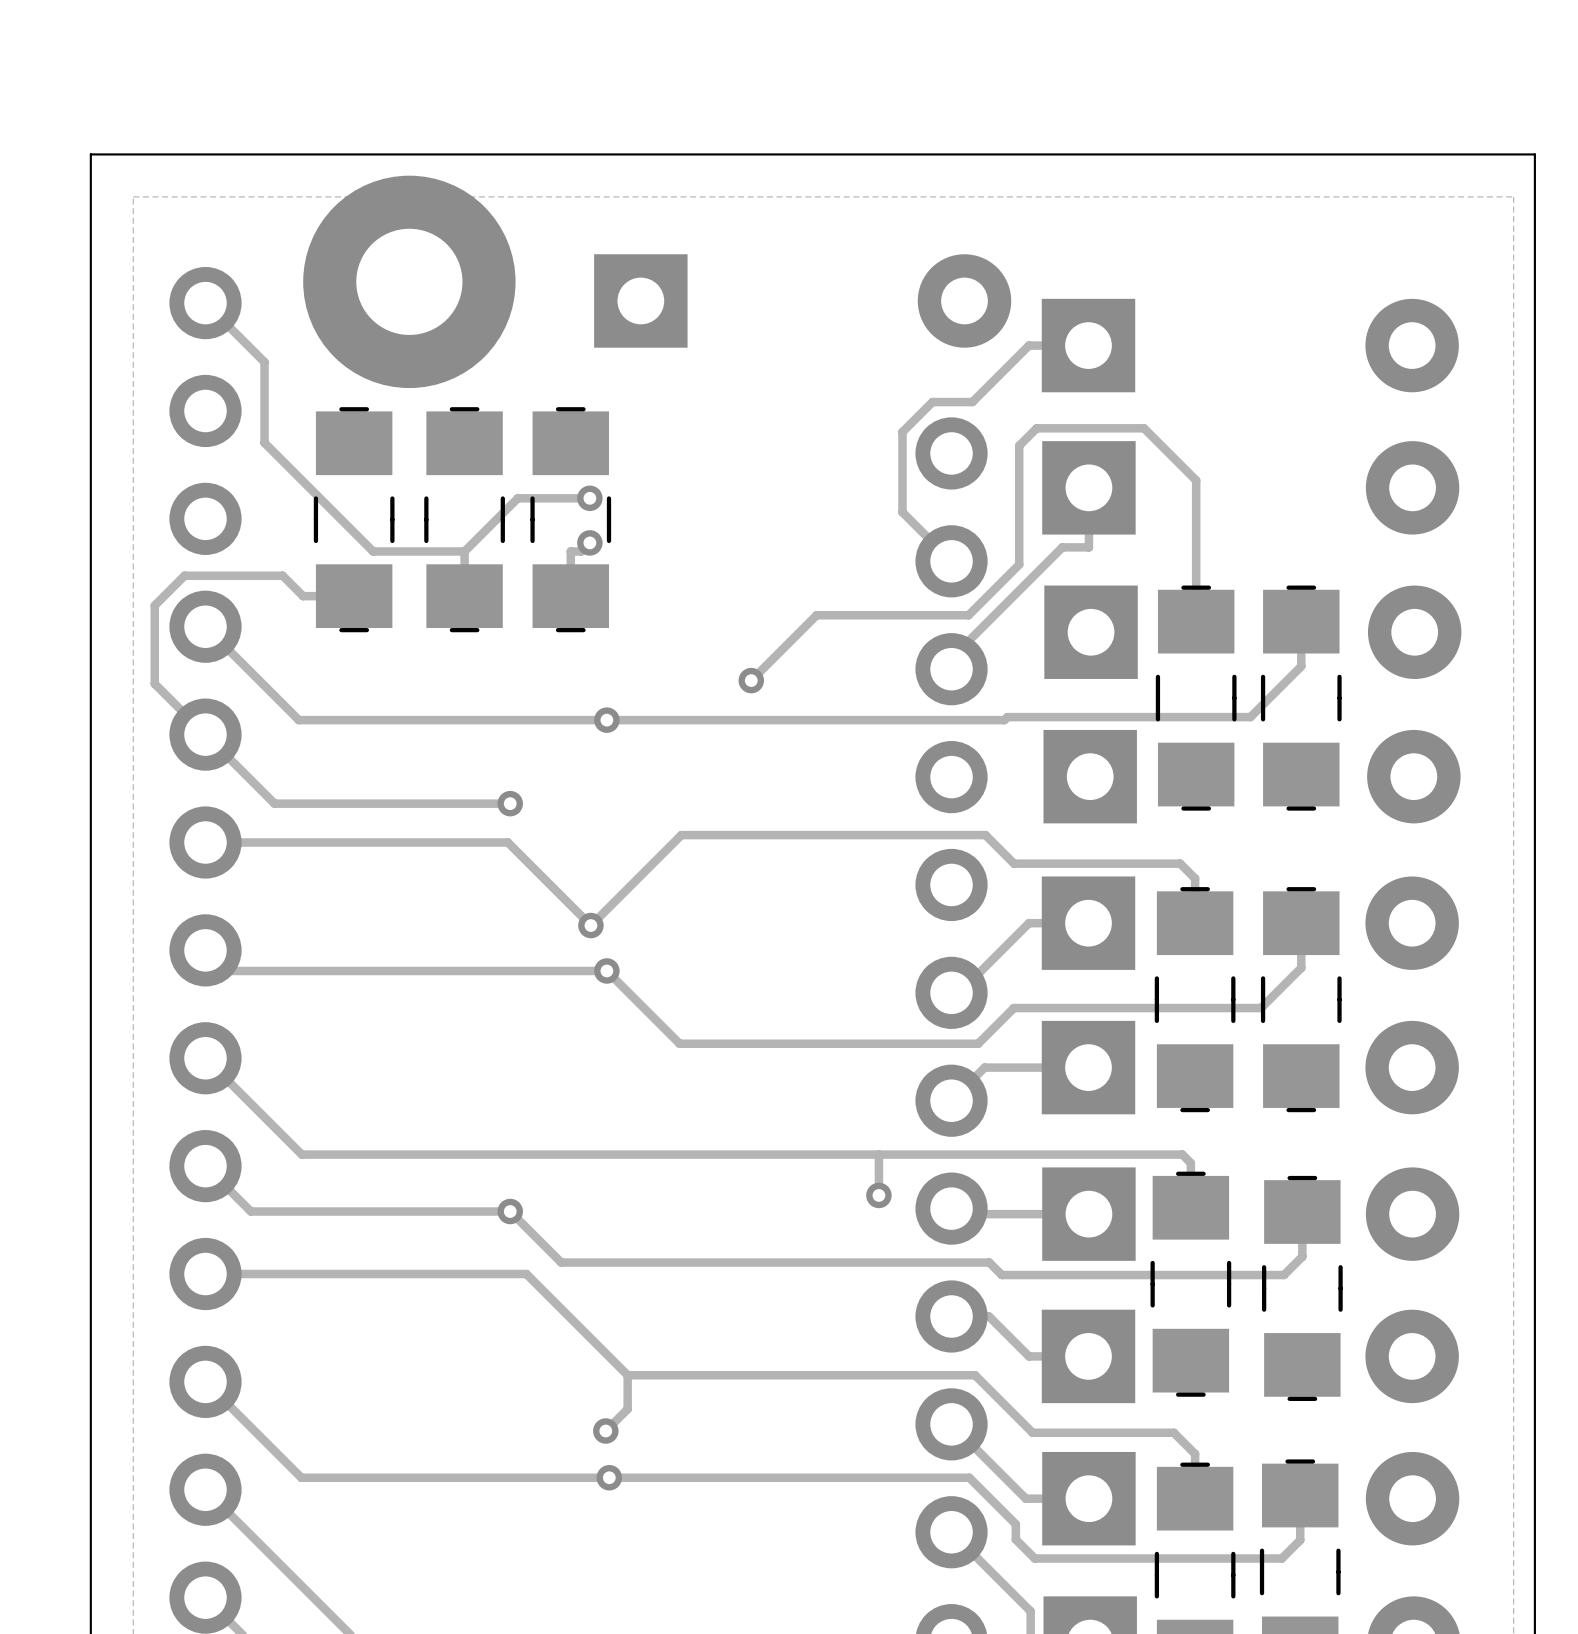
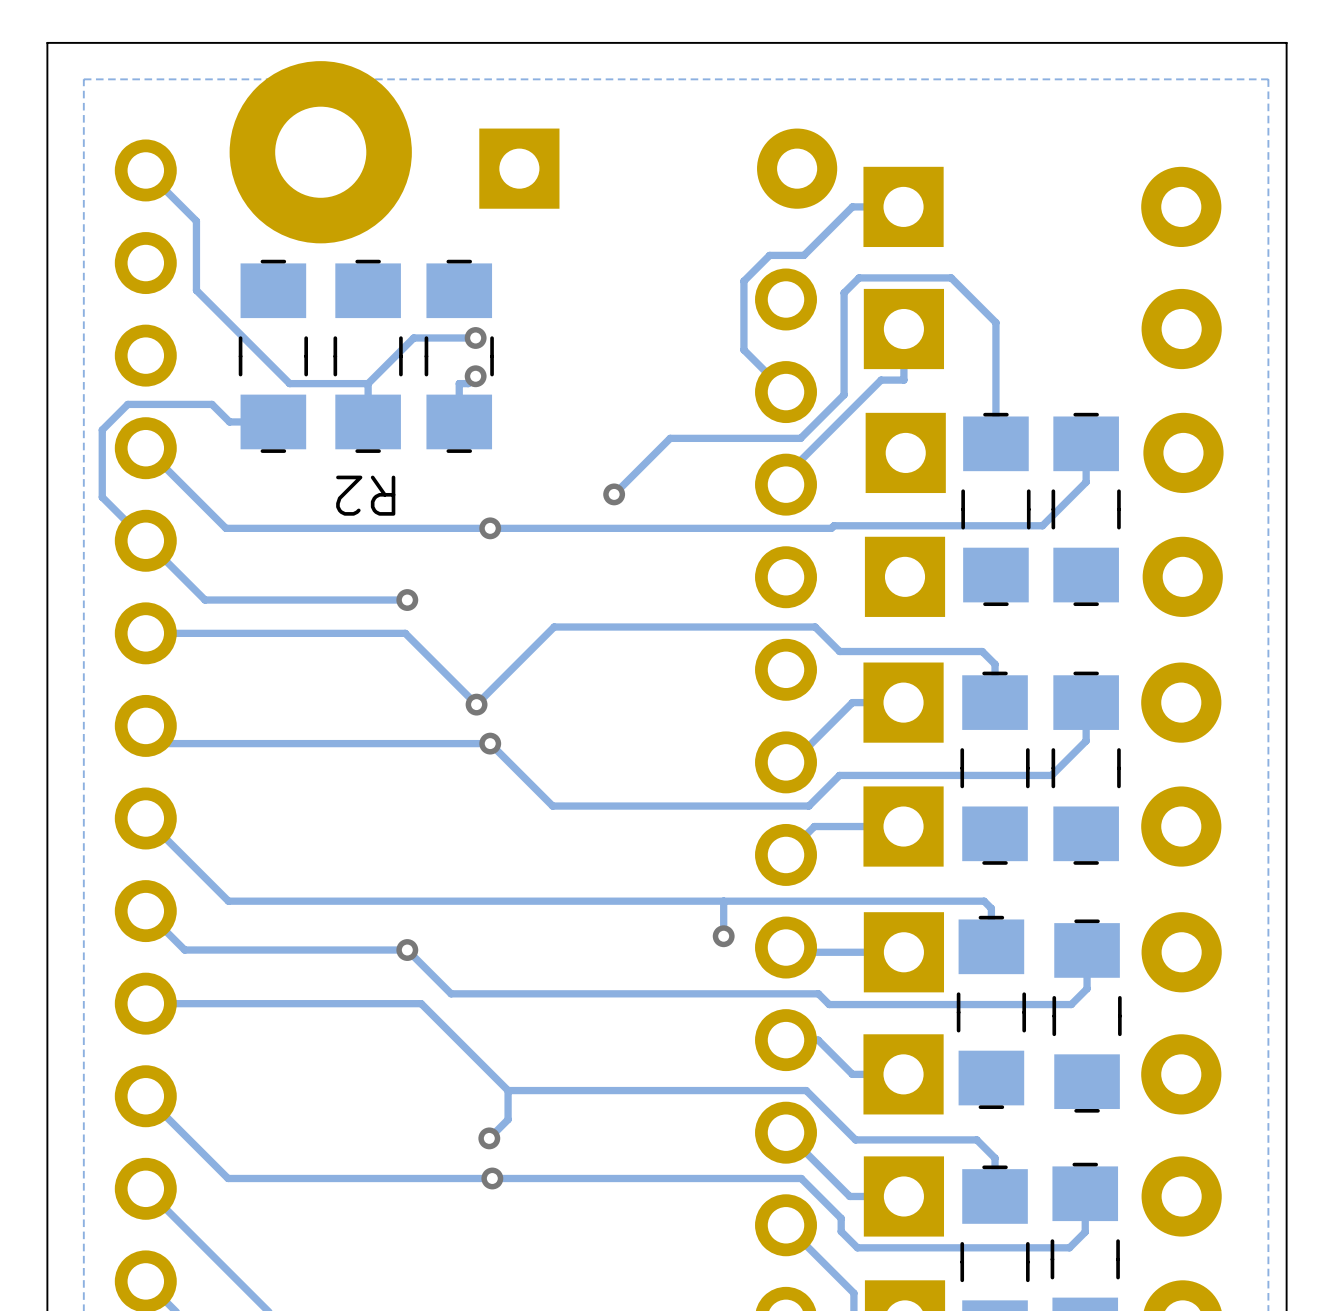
text: none -> R2 (365, 495)

